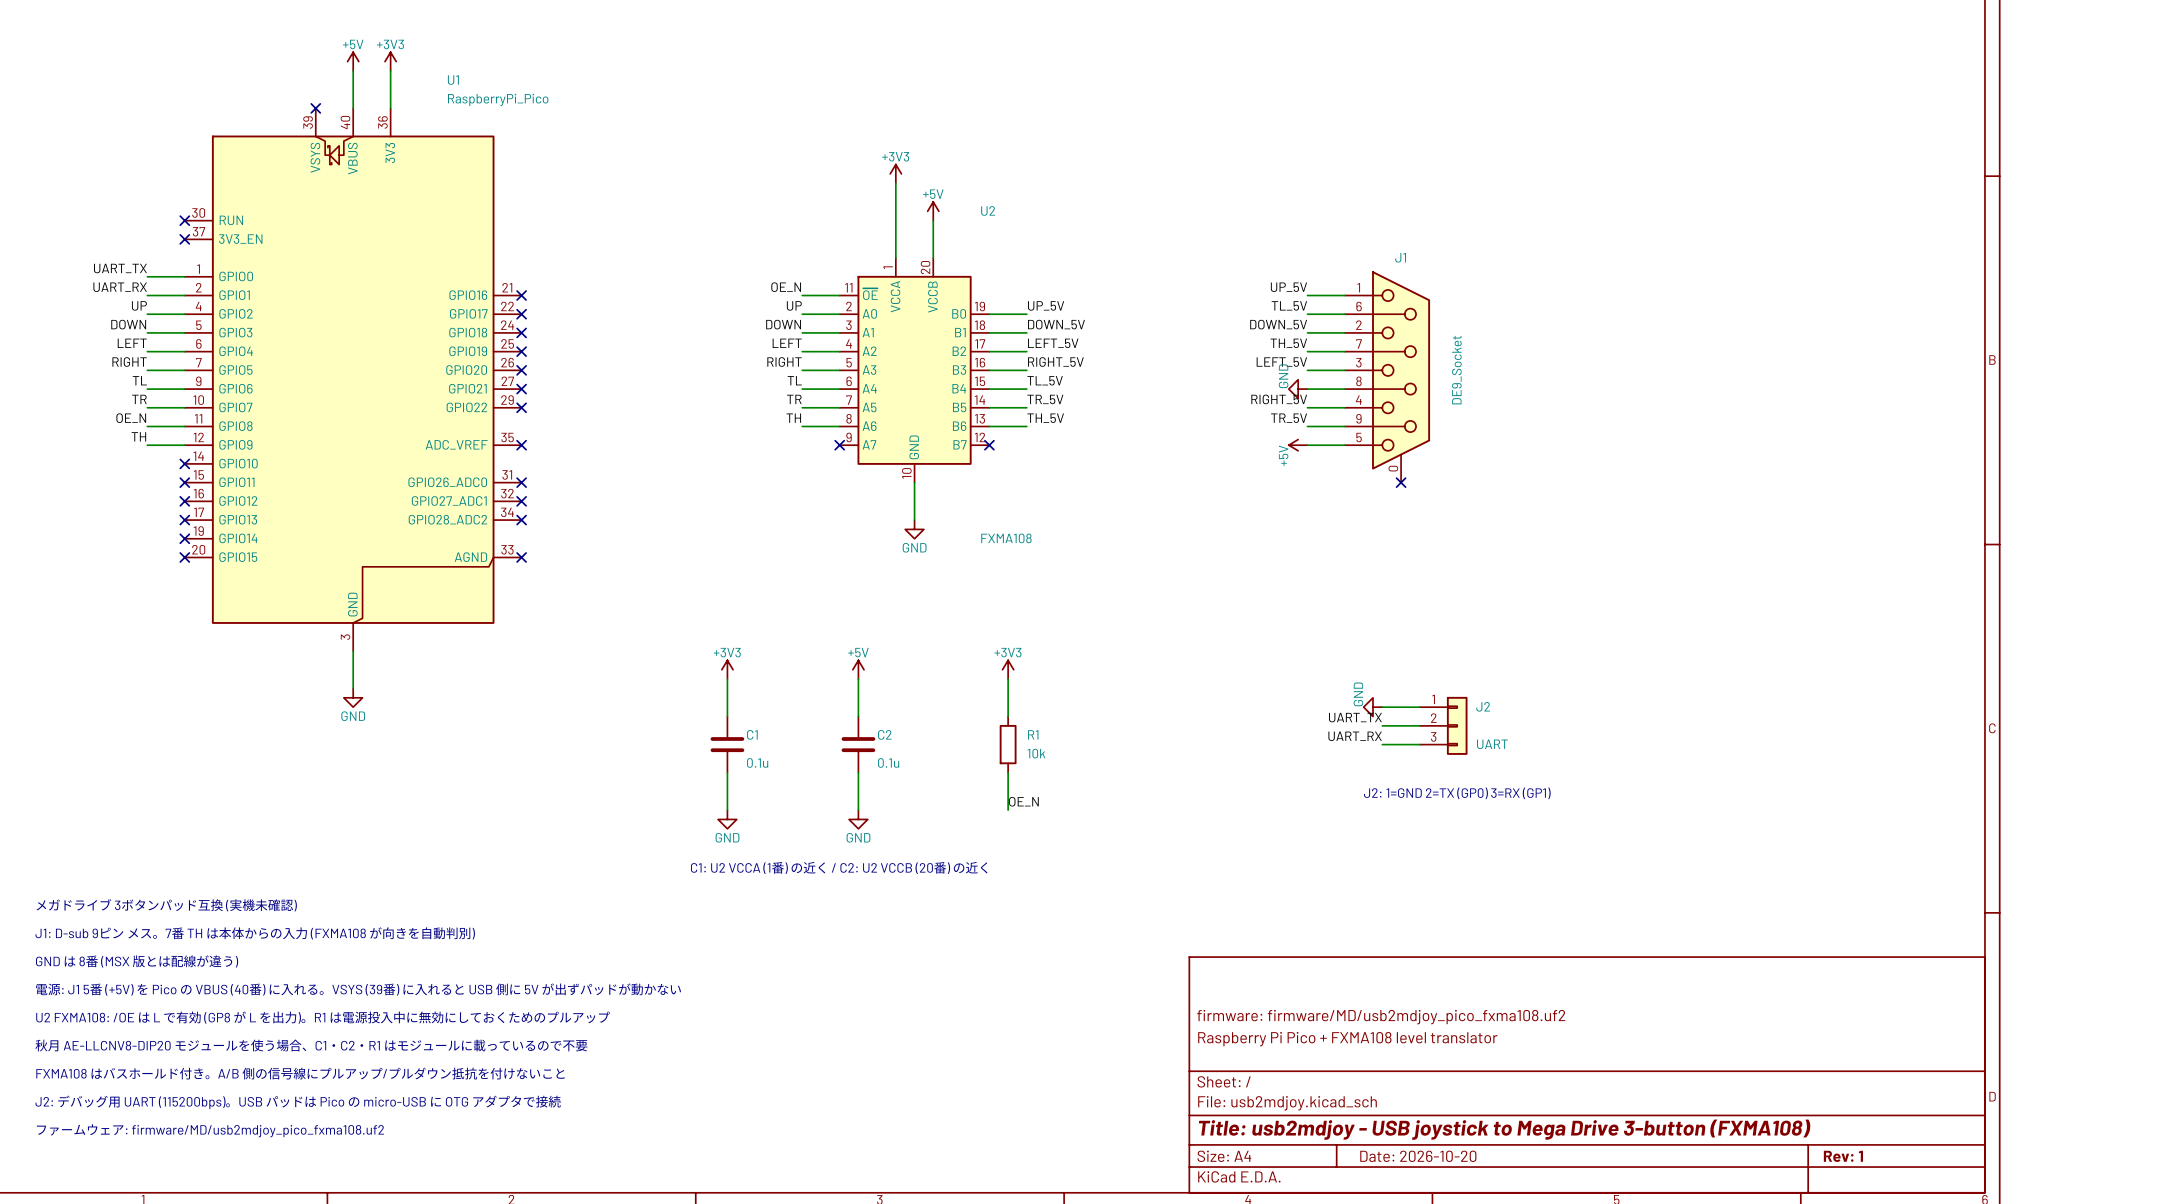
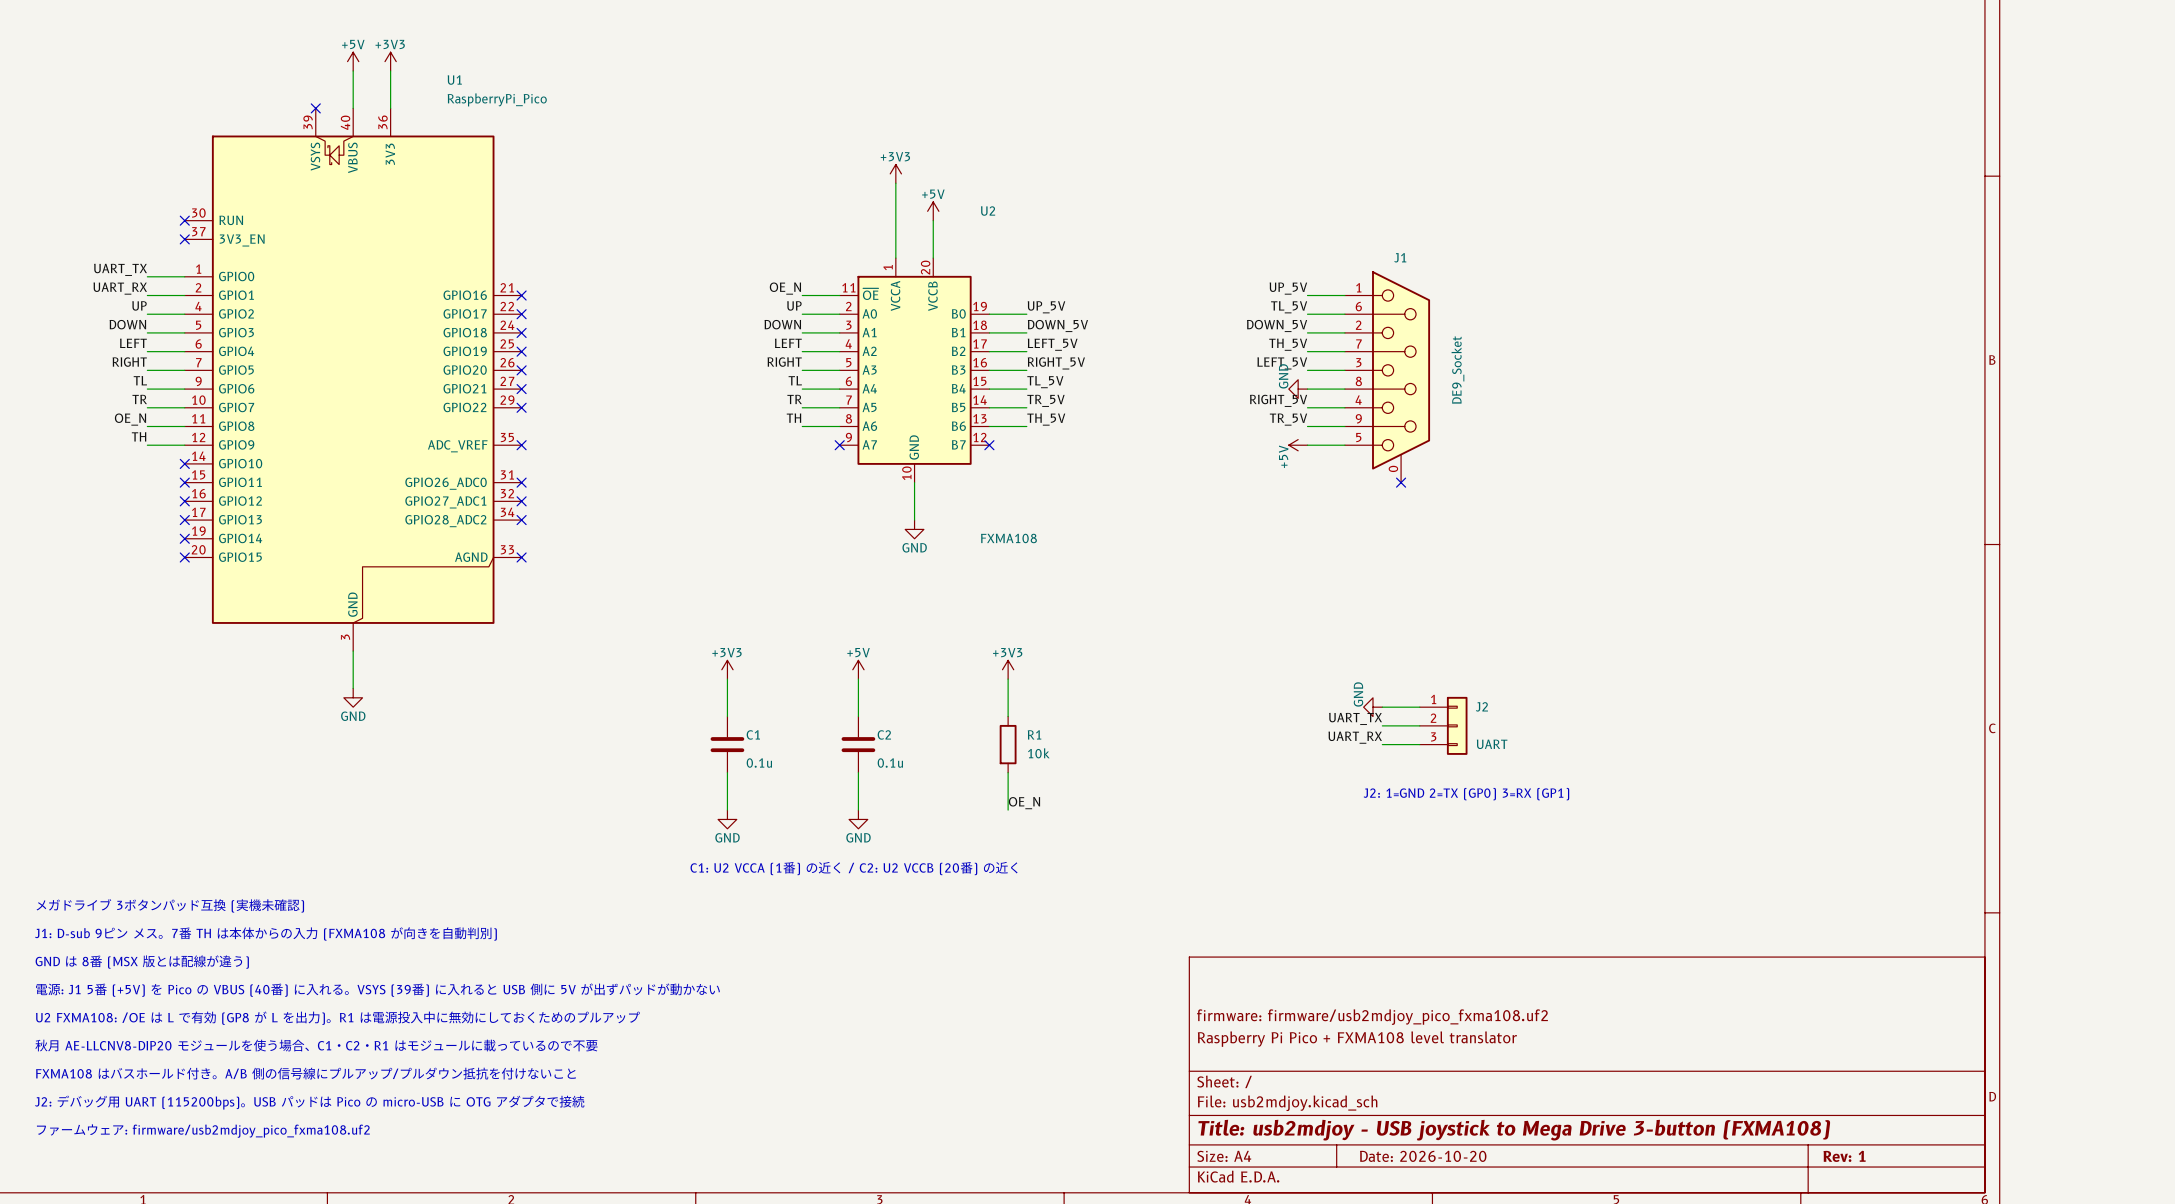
title block: firmware: firmware/MD/usb2mdjoy_pico_fxma108.uf2 (1381, 1017) -> firmware: firmware/usb2mdjoy_pico_fxma108.uf2 (1372, 1017)
text: ファームウェア: firmware/MD/usb2mdjoy_pico_fxma108.uf2 (210, 1130) -> ファームウェア: firmware/usb2mdjoy_pico_fxma108.uf2 (203, 1131)

